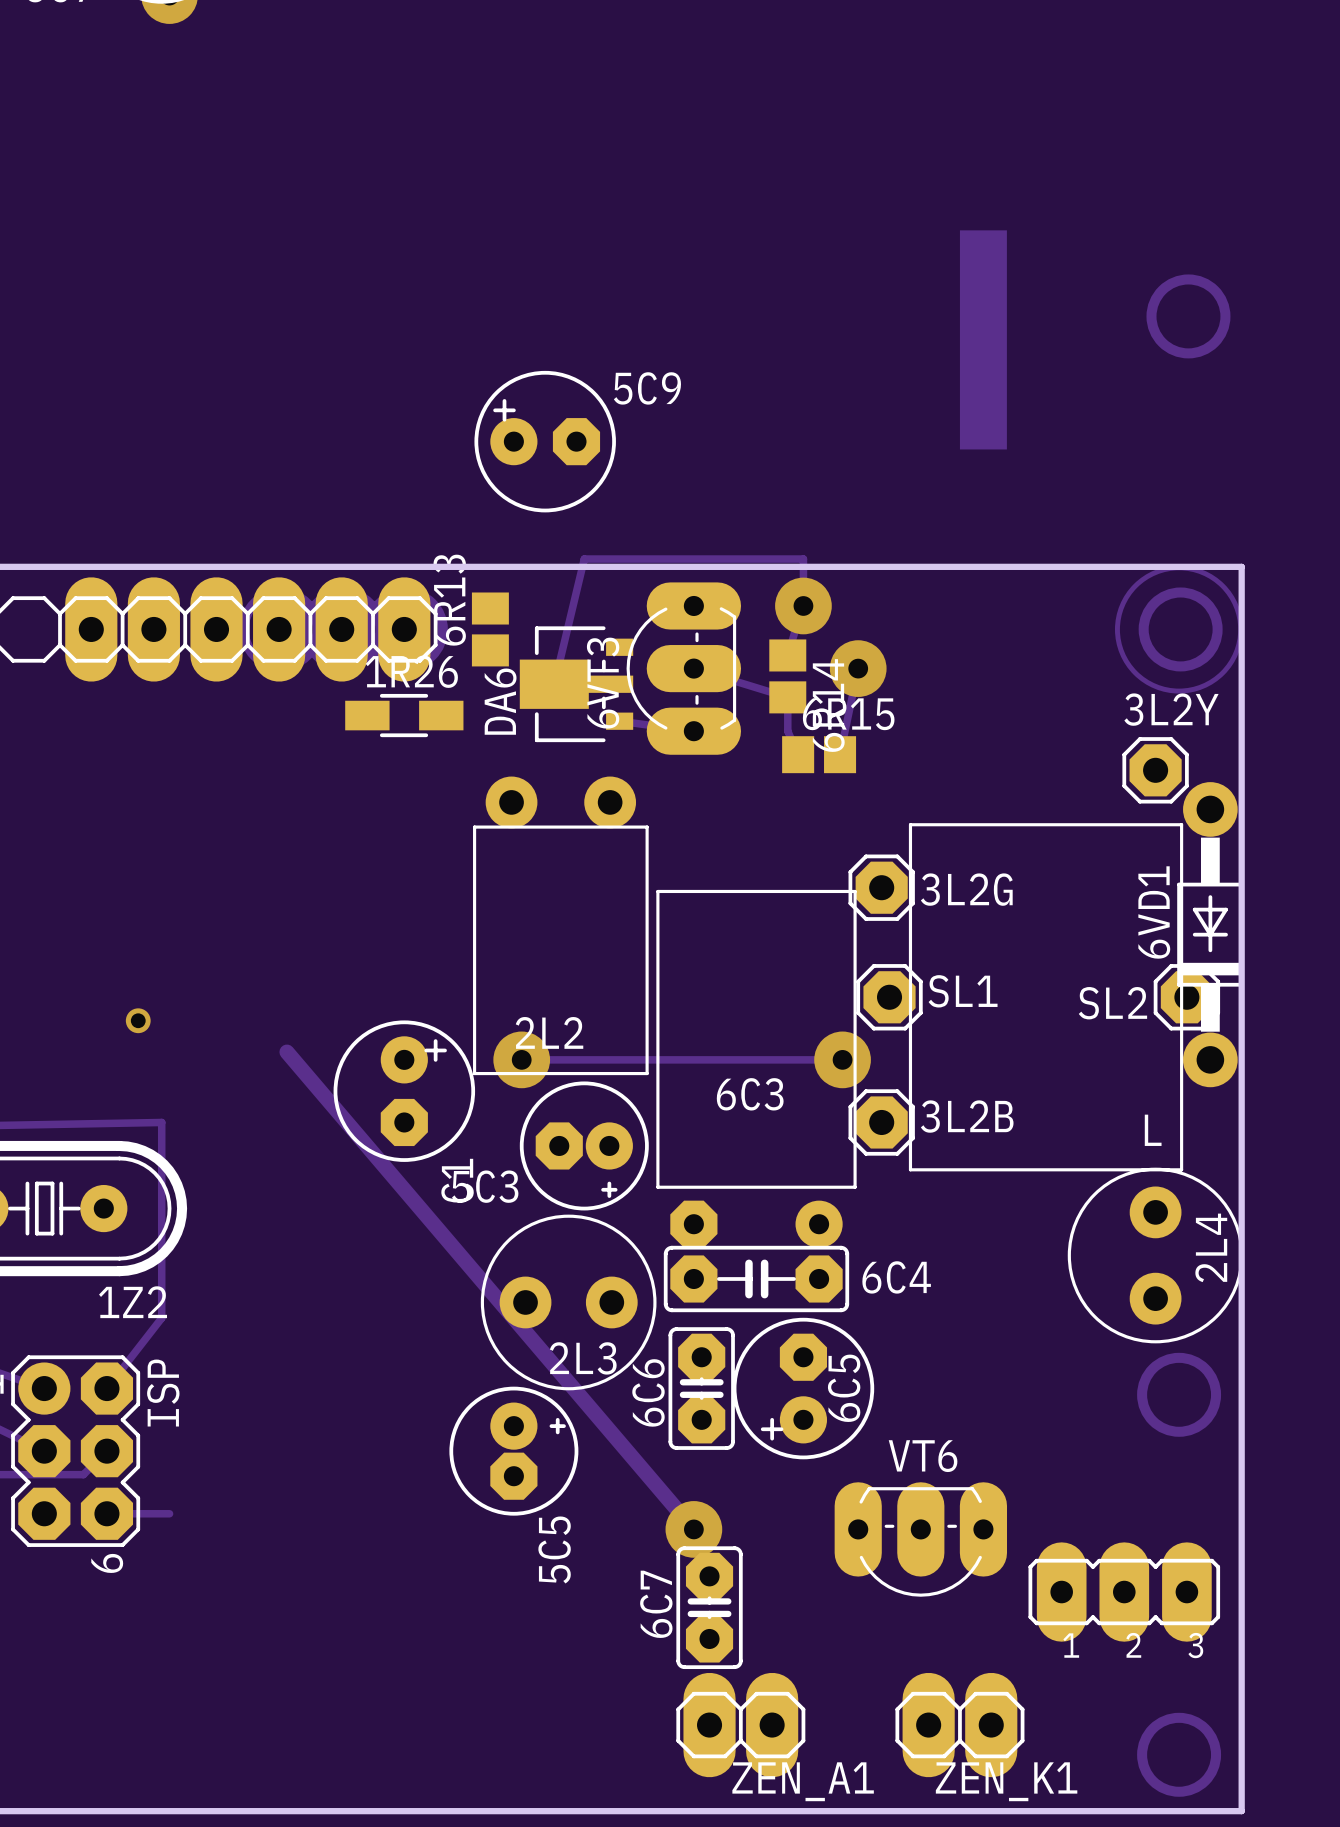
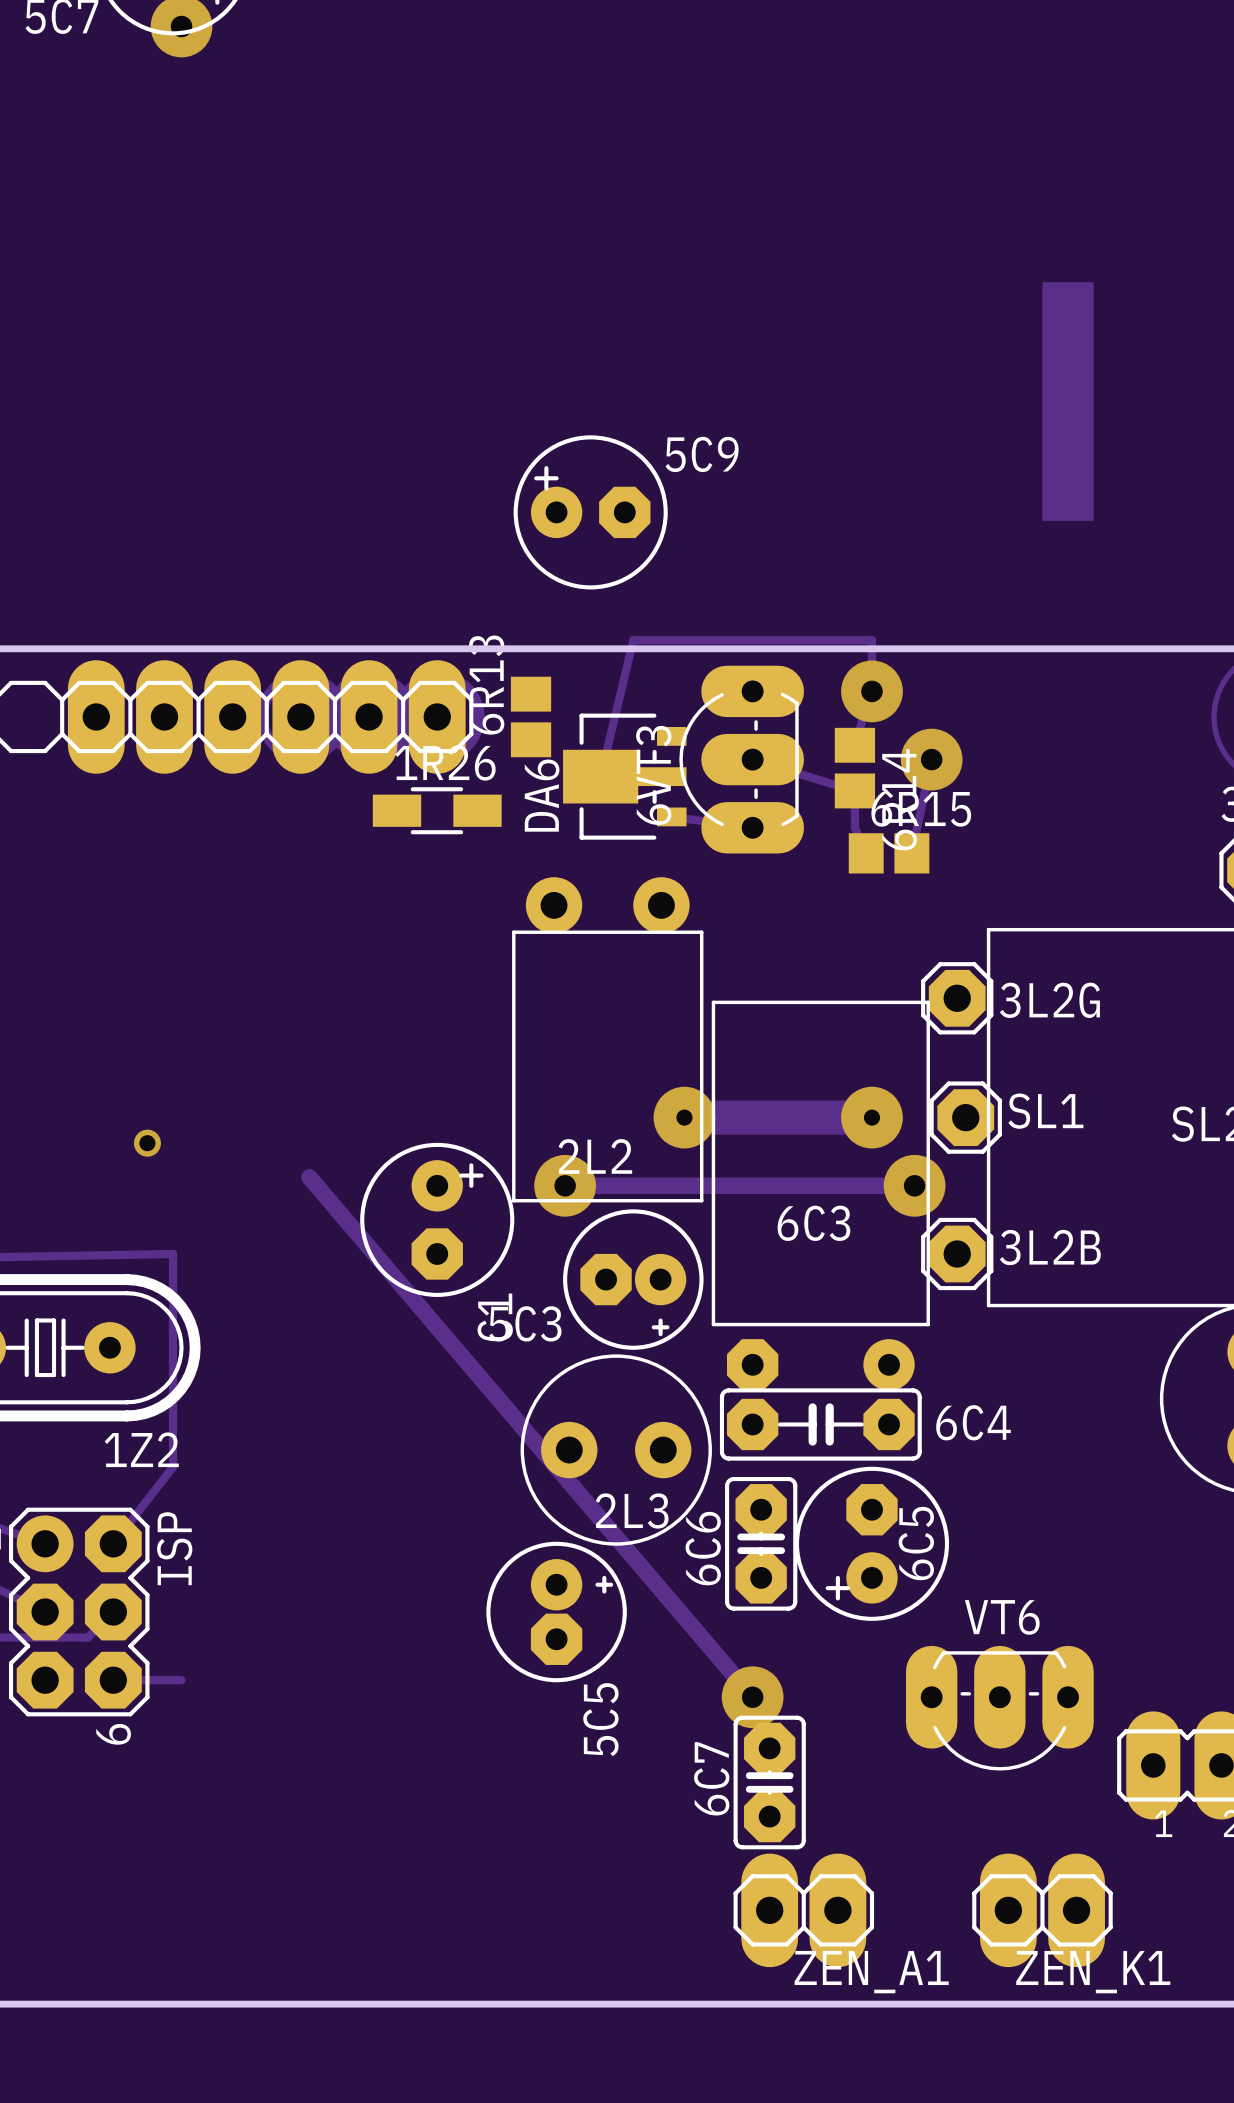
track: none -> (684, 1117) (871, 1117)
via: none -> (684, 1117)
via: none -> (871, 1117)
track width: thin (521, 1059) (842, 1059) -> thick (565, 1185) (914, 1185)

